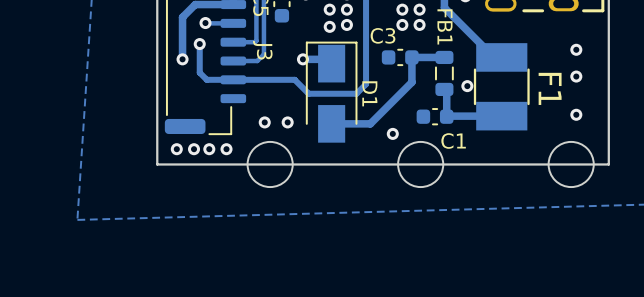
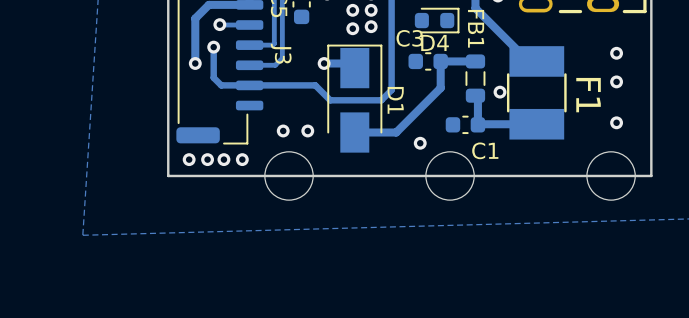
via: (402, 9) -> none
via: (419, 9) -> none
D4: none -> (437, 20)
via: (402, 24) -> none
via: (419, 24) -> none

